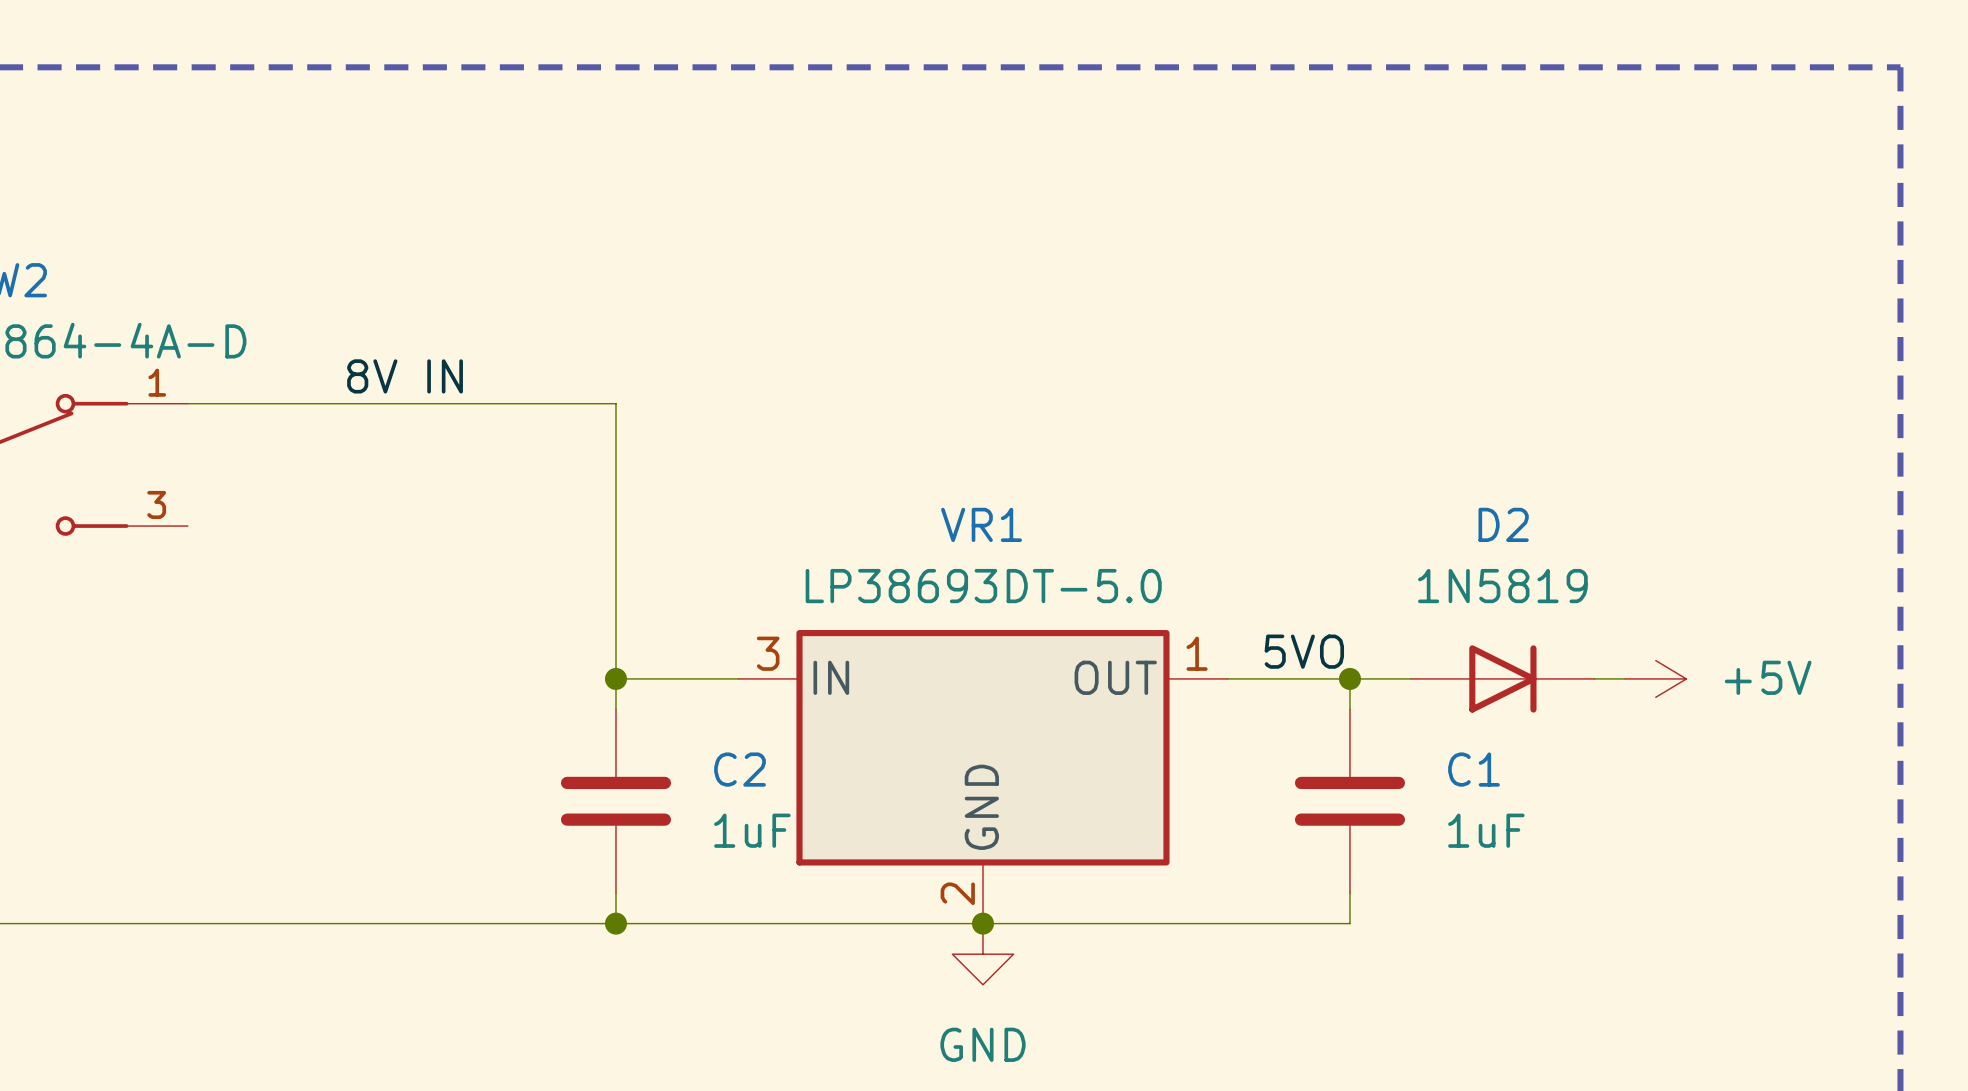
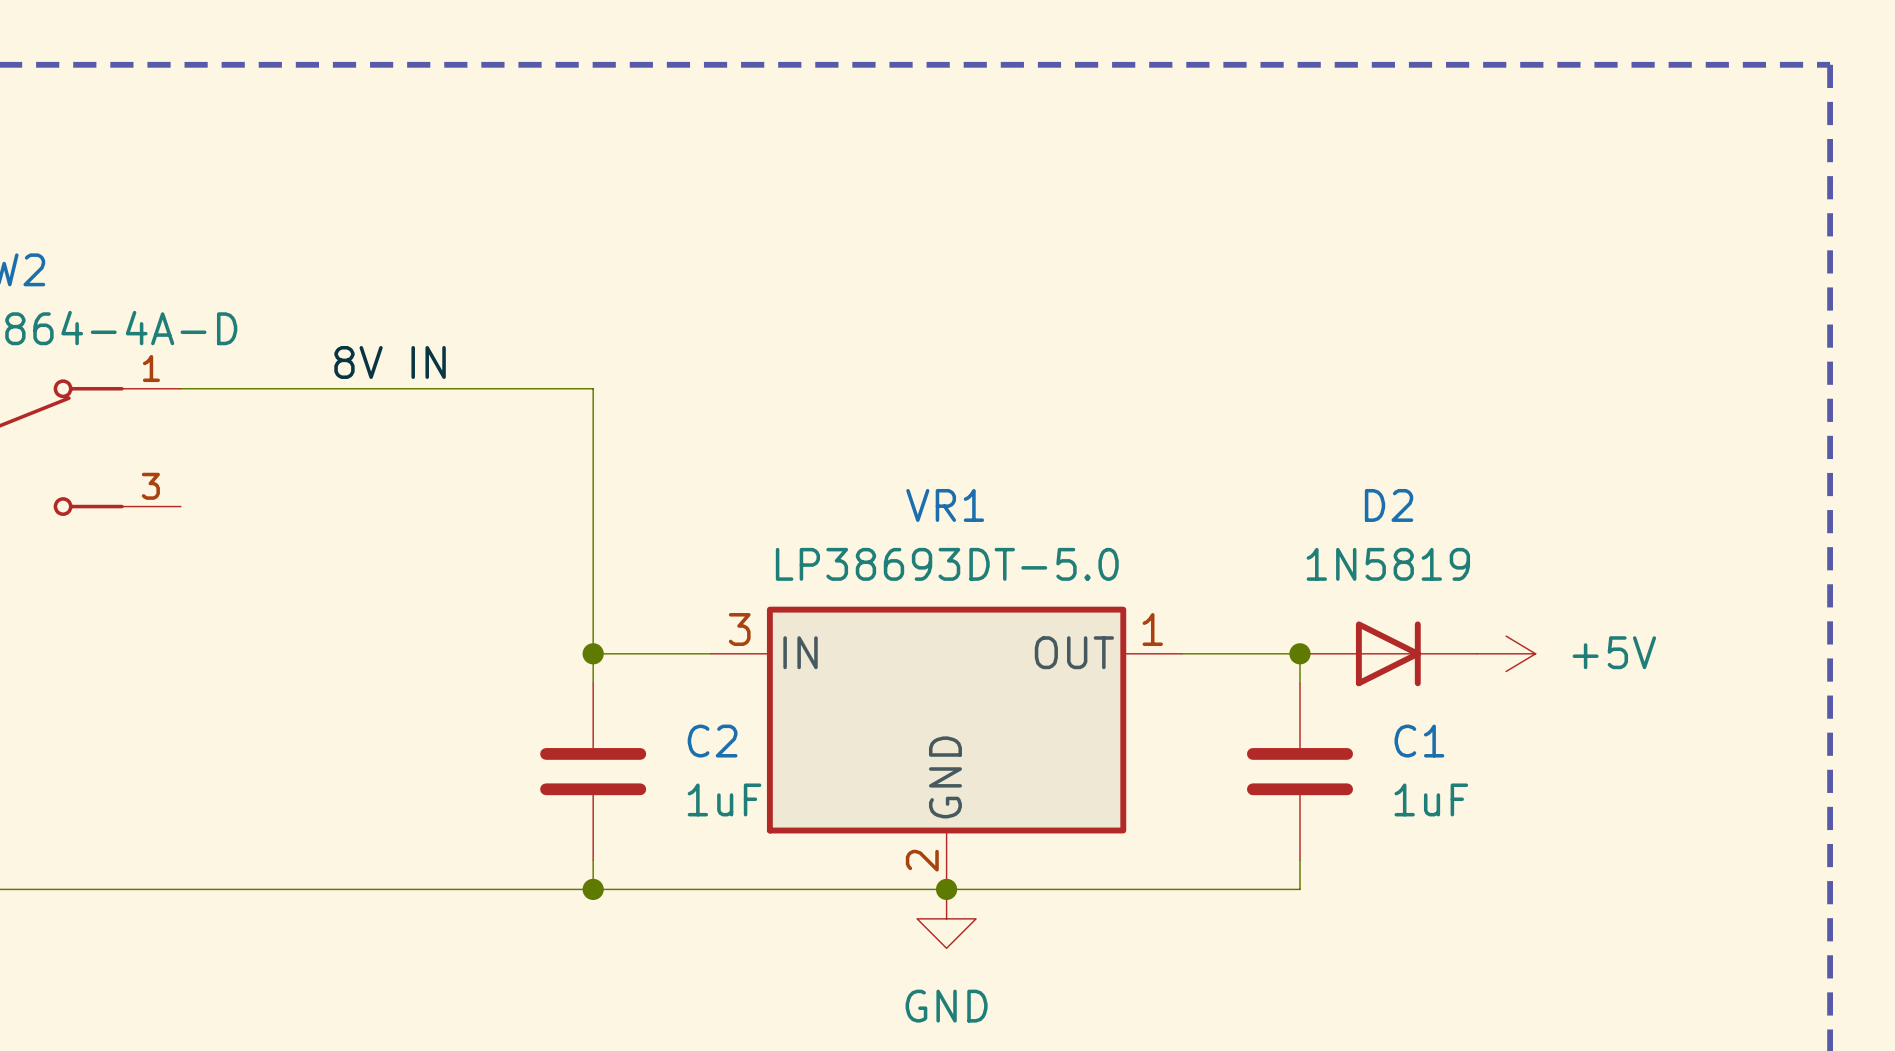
label: 5VO (1304, 651) -> none
D2 position: (1502, 678) -> (1388, 653)
wire: (1594, 678) (1625, 678) -> none
power symbol position: +5V (1655, 678) -> +5V (1506, 653)

